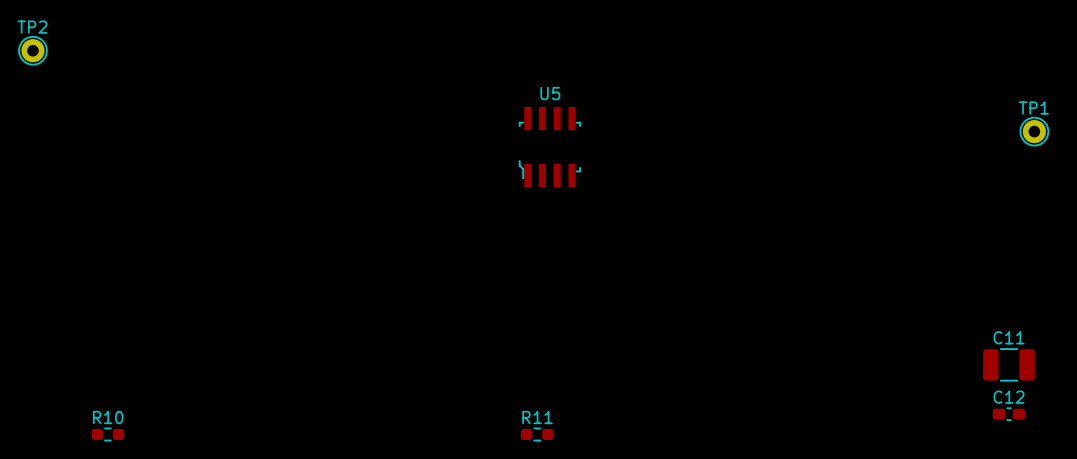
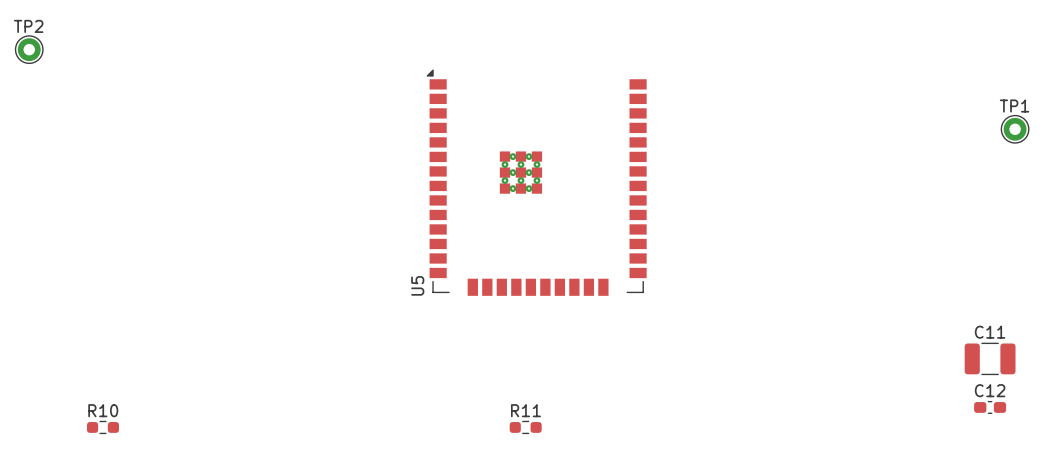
U5 name position: U5 (550, 93) -> U5 (417, 285)
U5 footprint: [519, 107, 581, 188] -> [426, 69, 647, 296]

